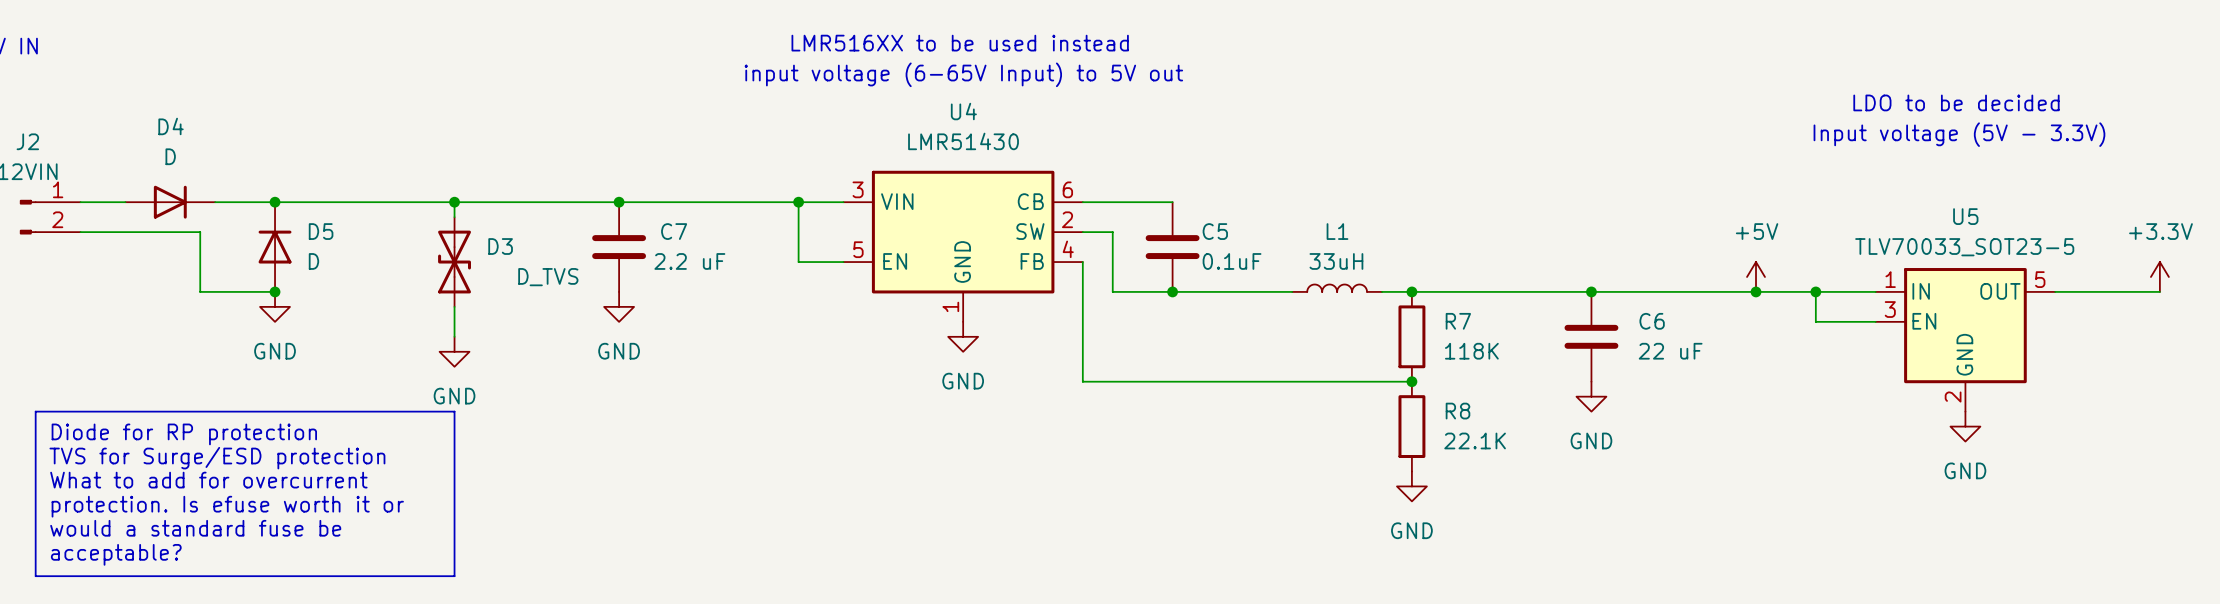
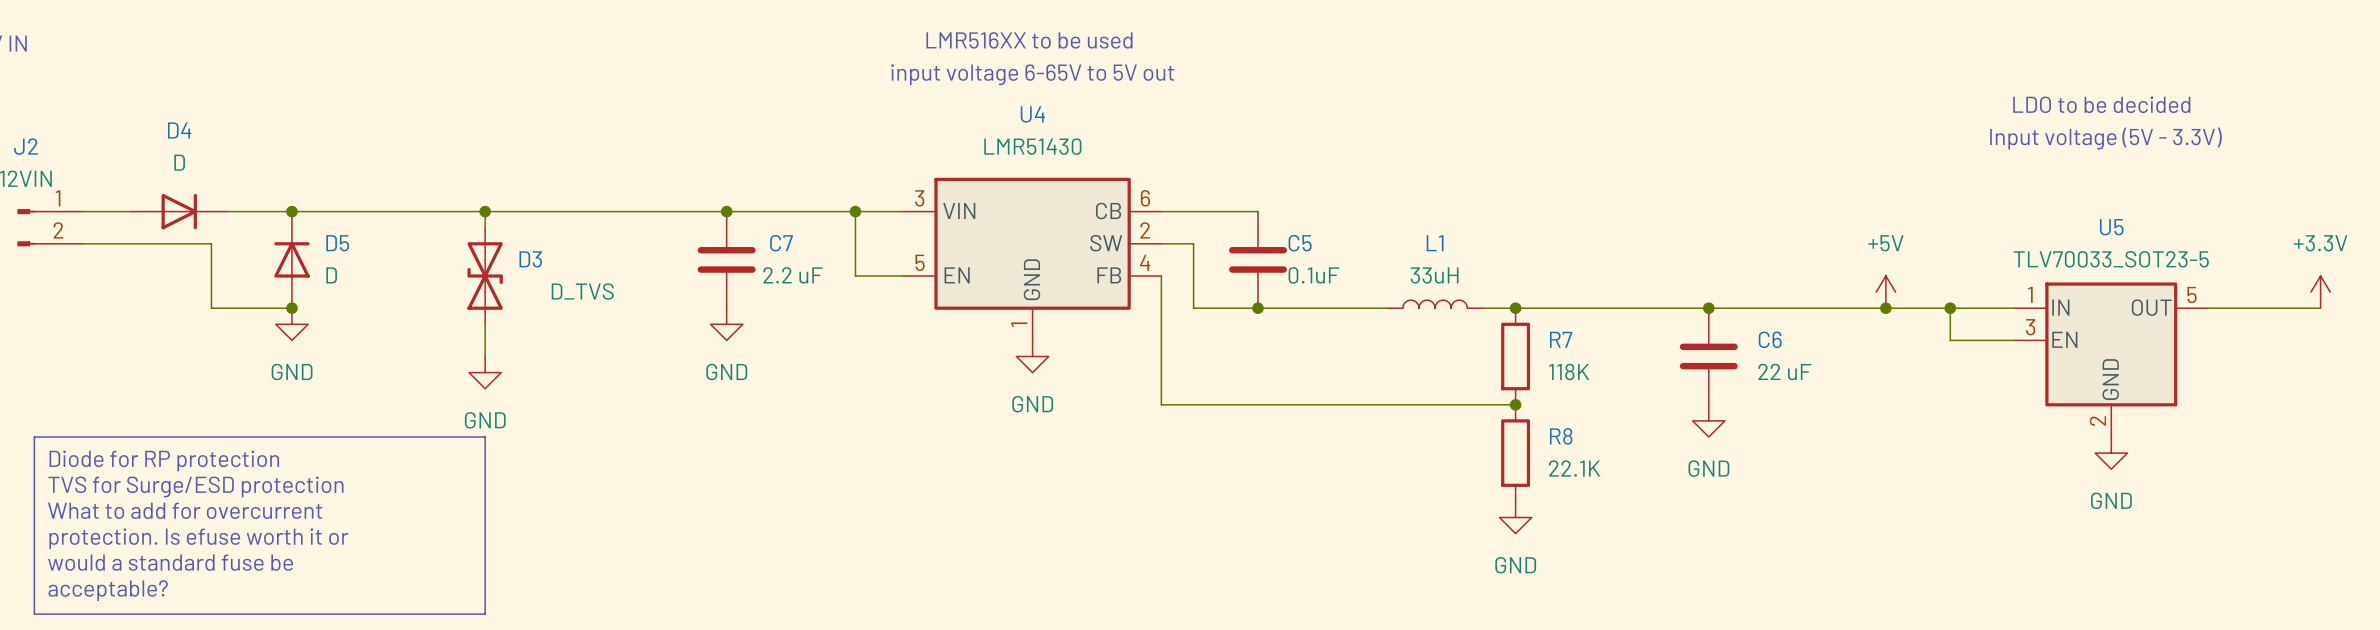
text: LMR516XX to be used instead (960, 43) -> LMR516XX to be used (1029, 40)
text: input voltage (6-65V Input) to 5V out (963, 74) -> input voltage 6-65V to 5V out (1032, 74)
junction position: (619, 202) -> (726, 211)
C7 position: (619, 247) -> (726, 259)
power symbol position: GND (619, 306) -> GND (726, 324)

